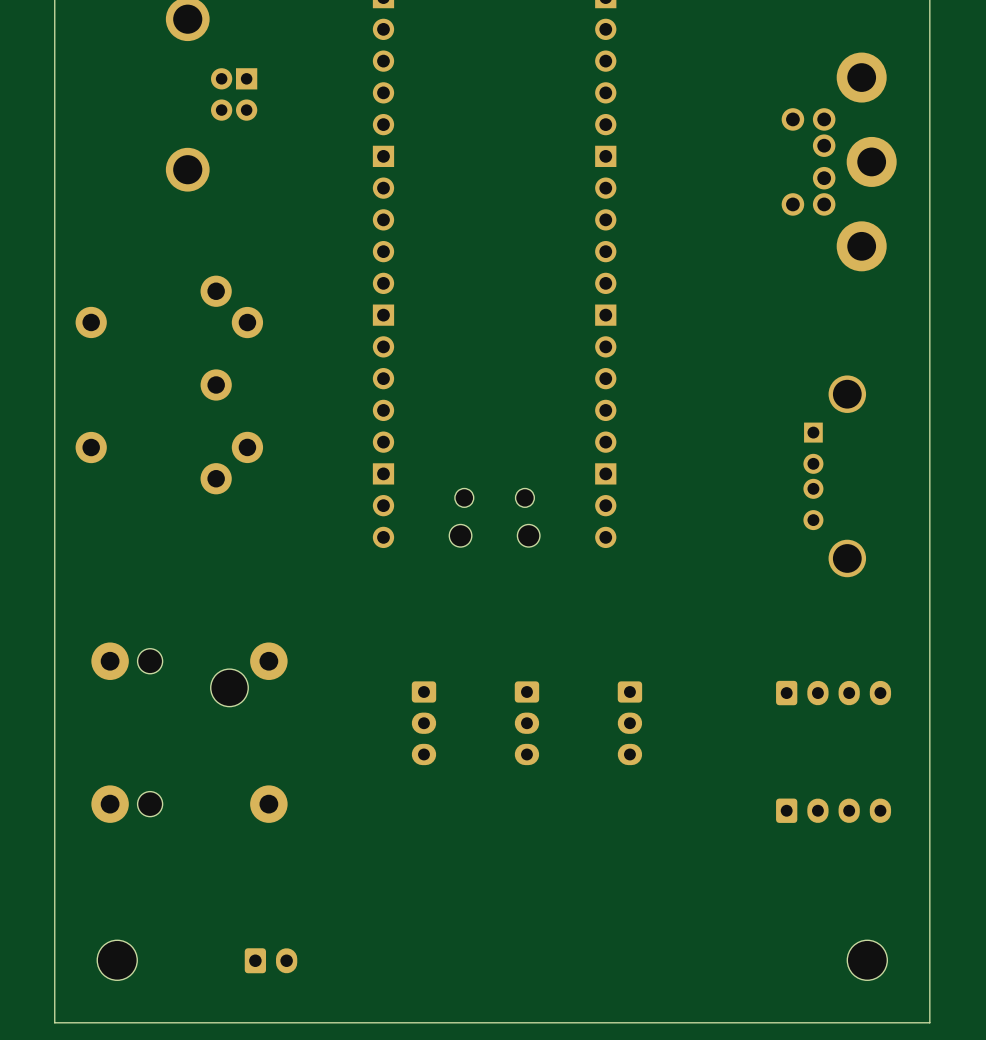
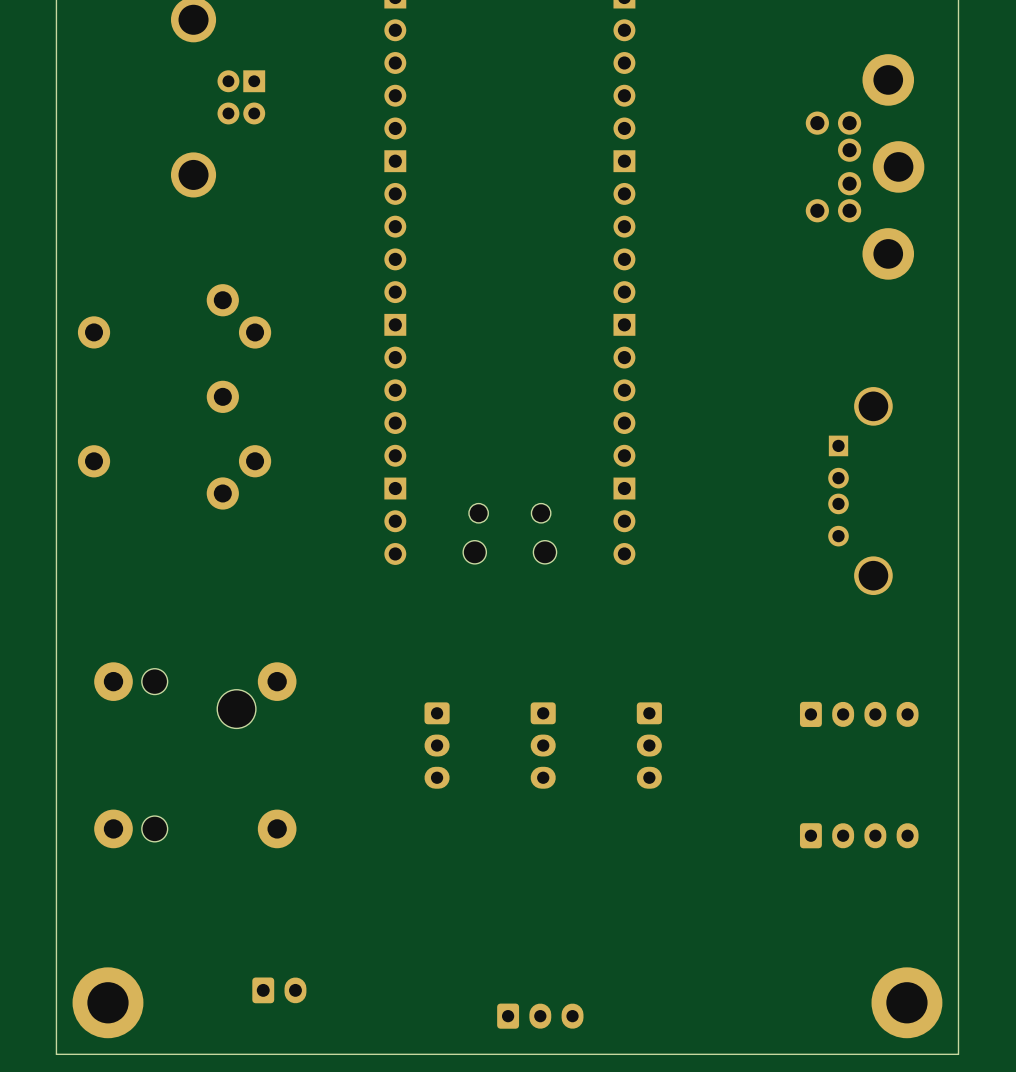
part: (117, 960) -> none
part: (867, 960) -> none
part: none -> (107, 1002)
part: none -> (906, 1002)
part: none -> (540, 1016)

